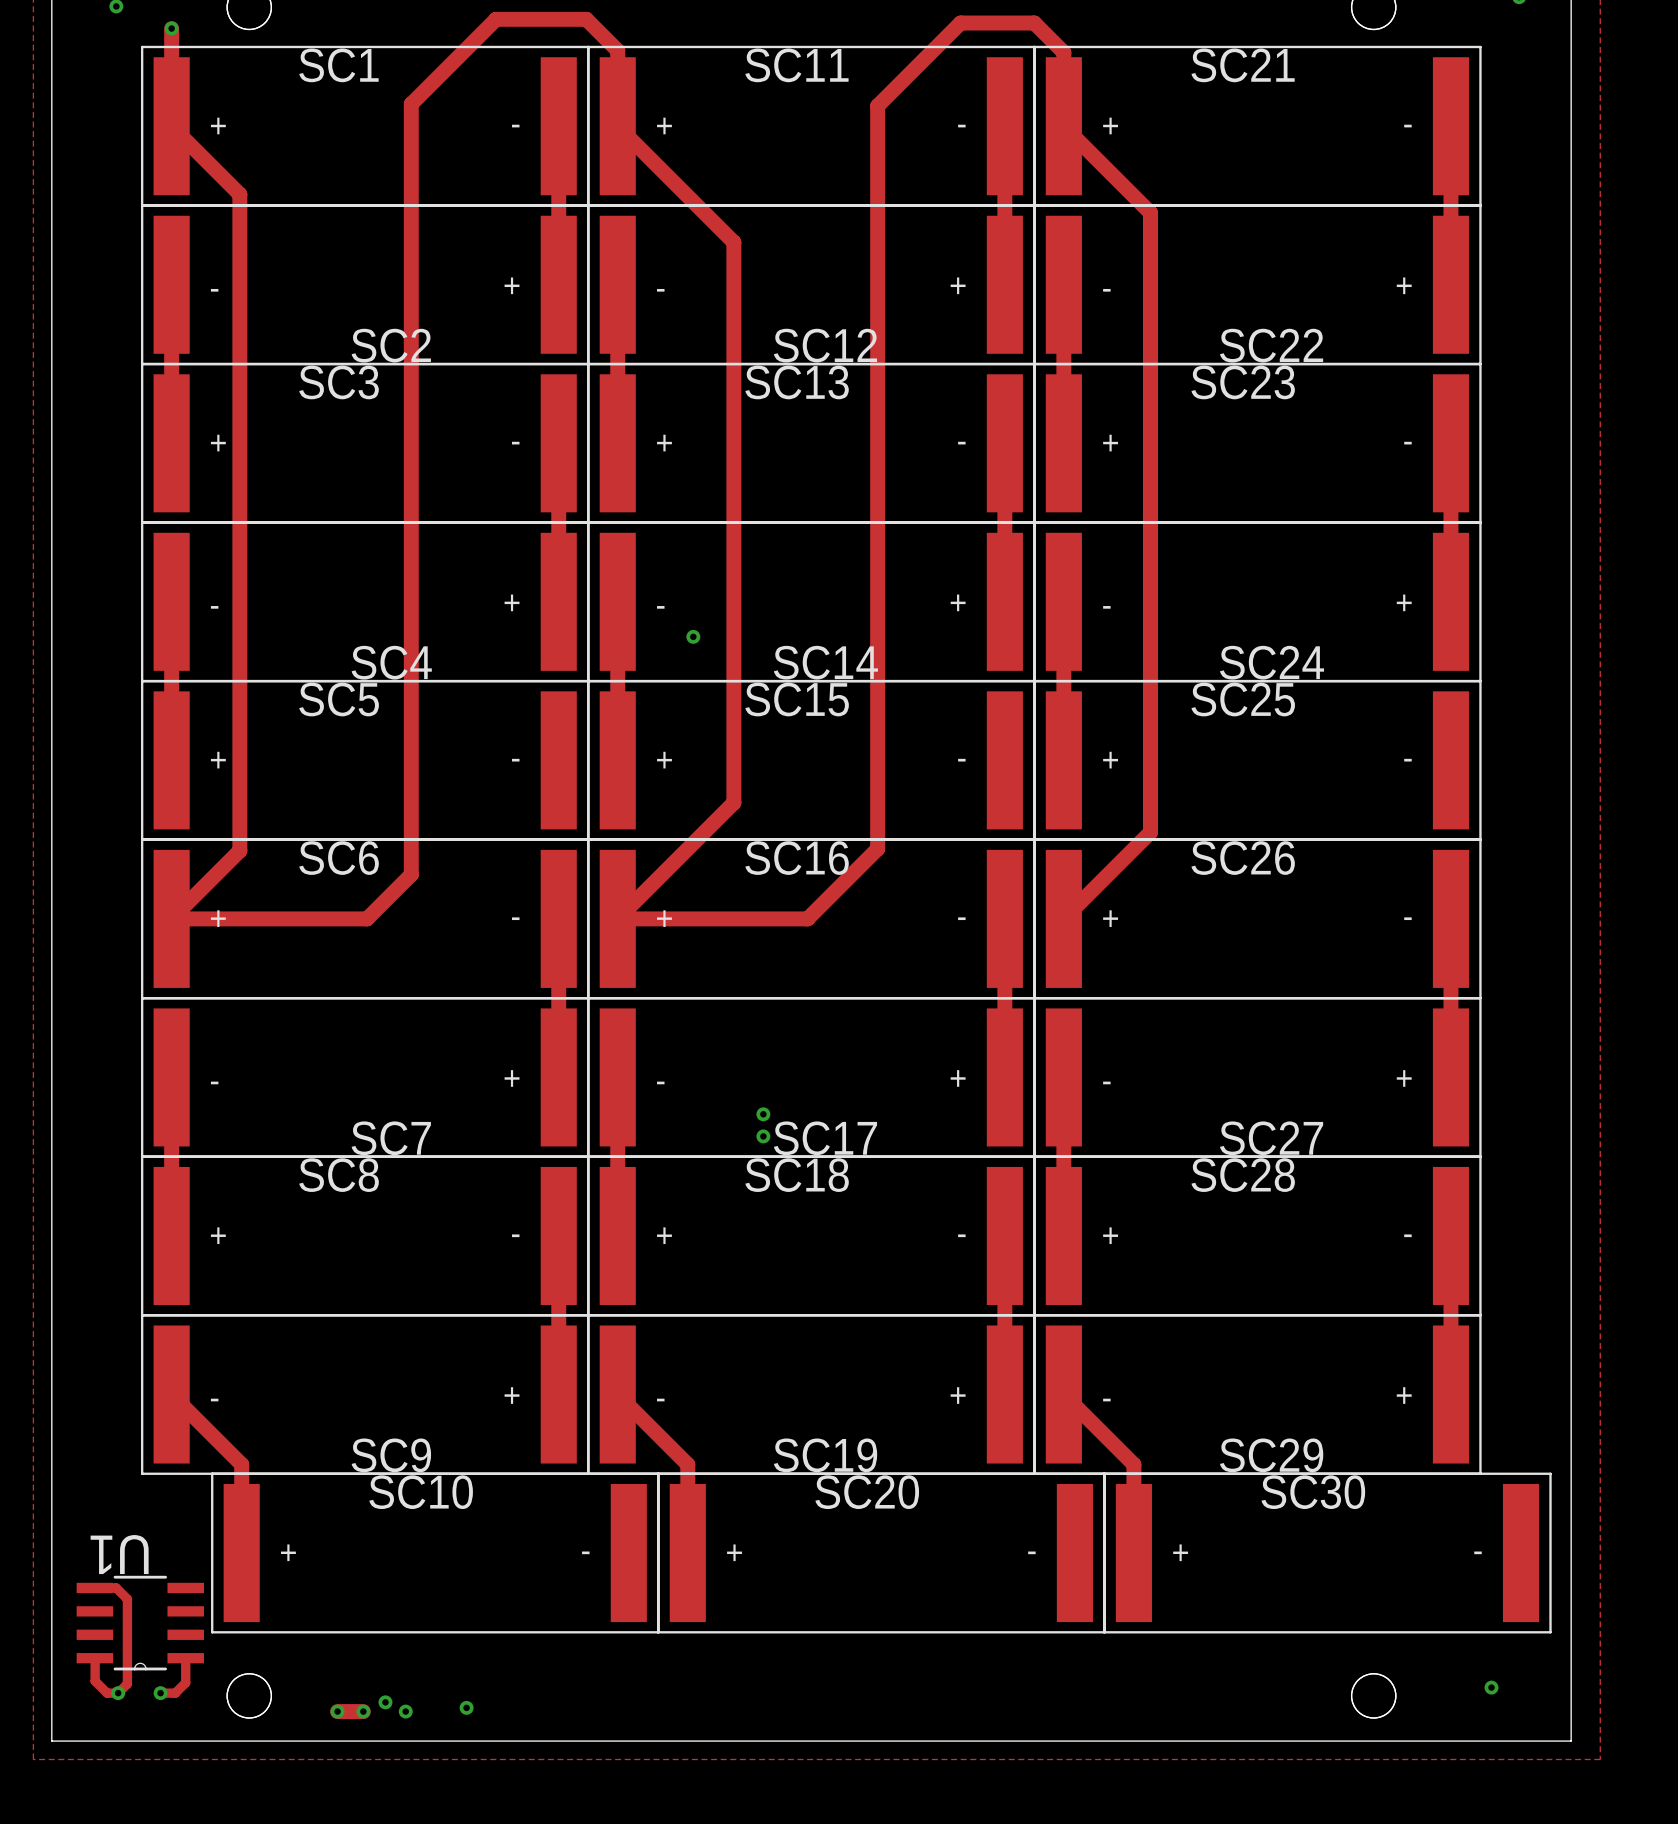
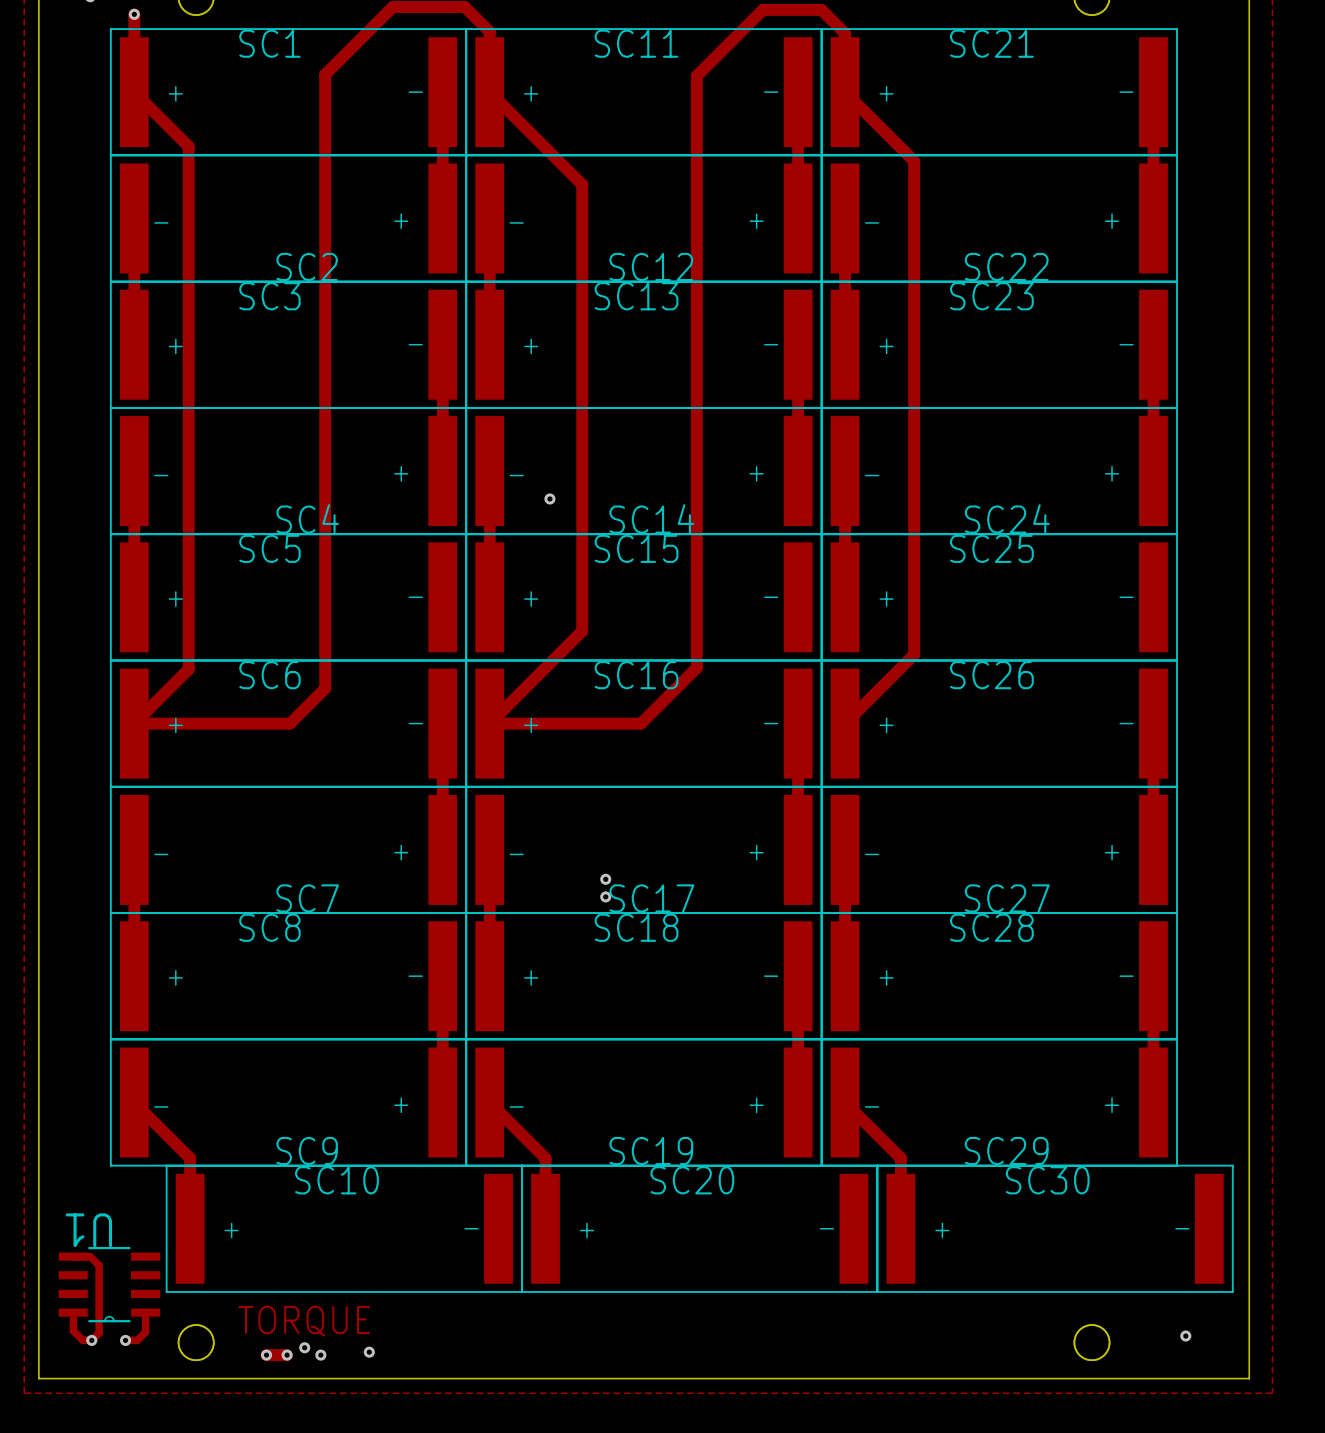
text: none -> TORQUE (304, 1321)

